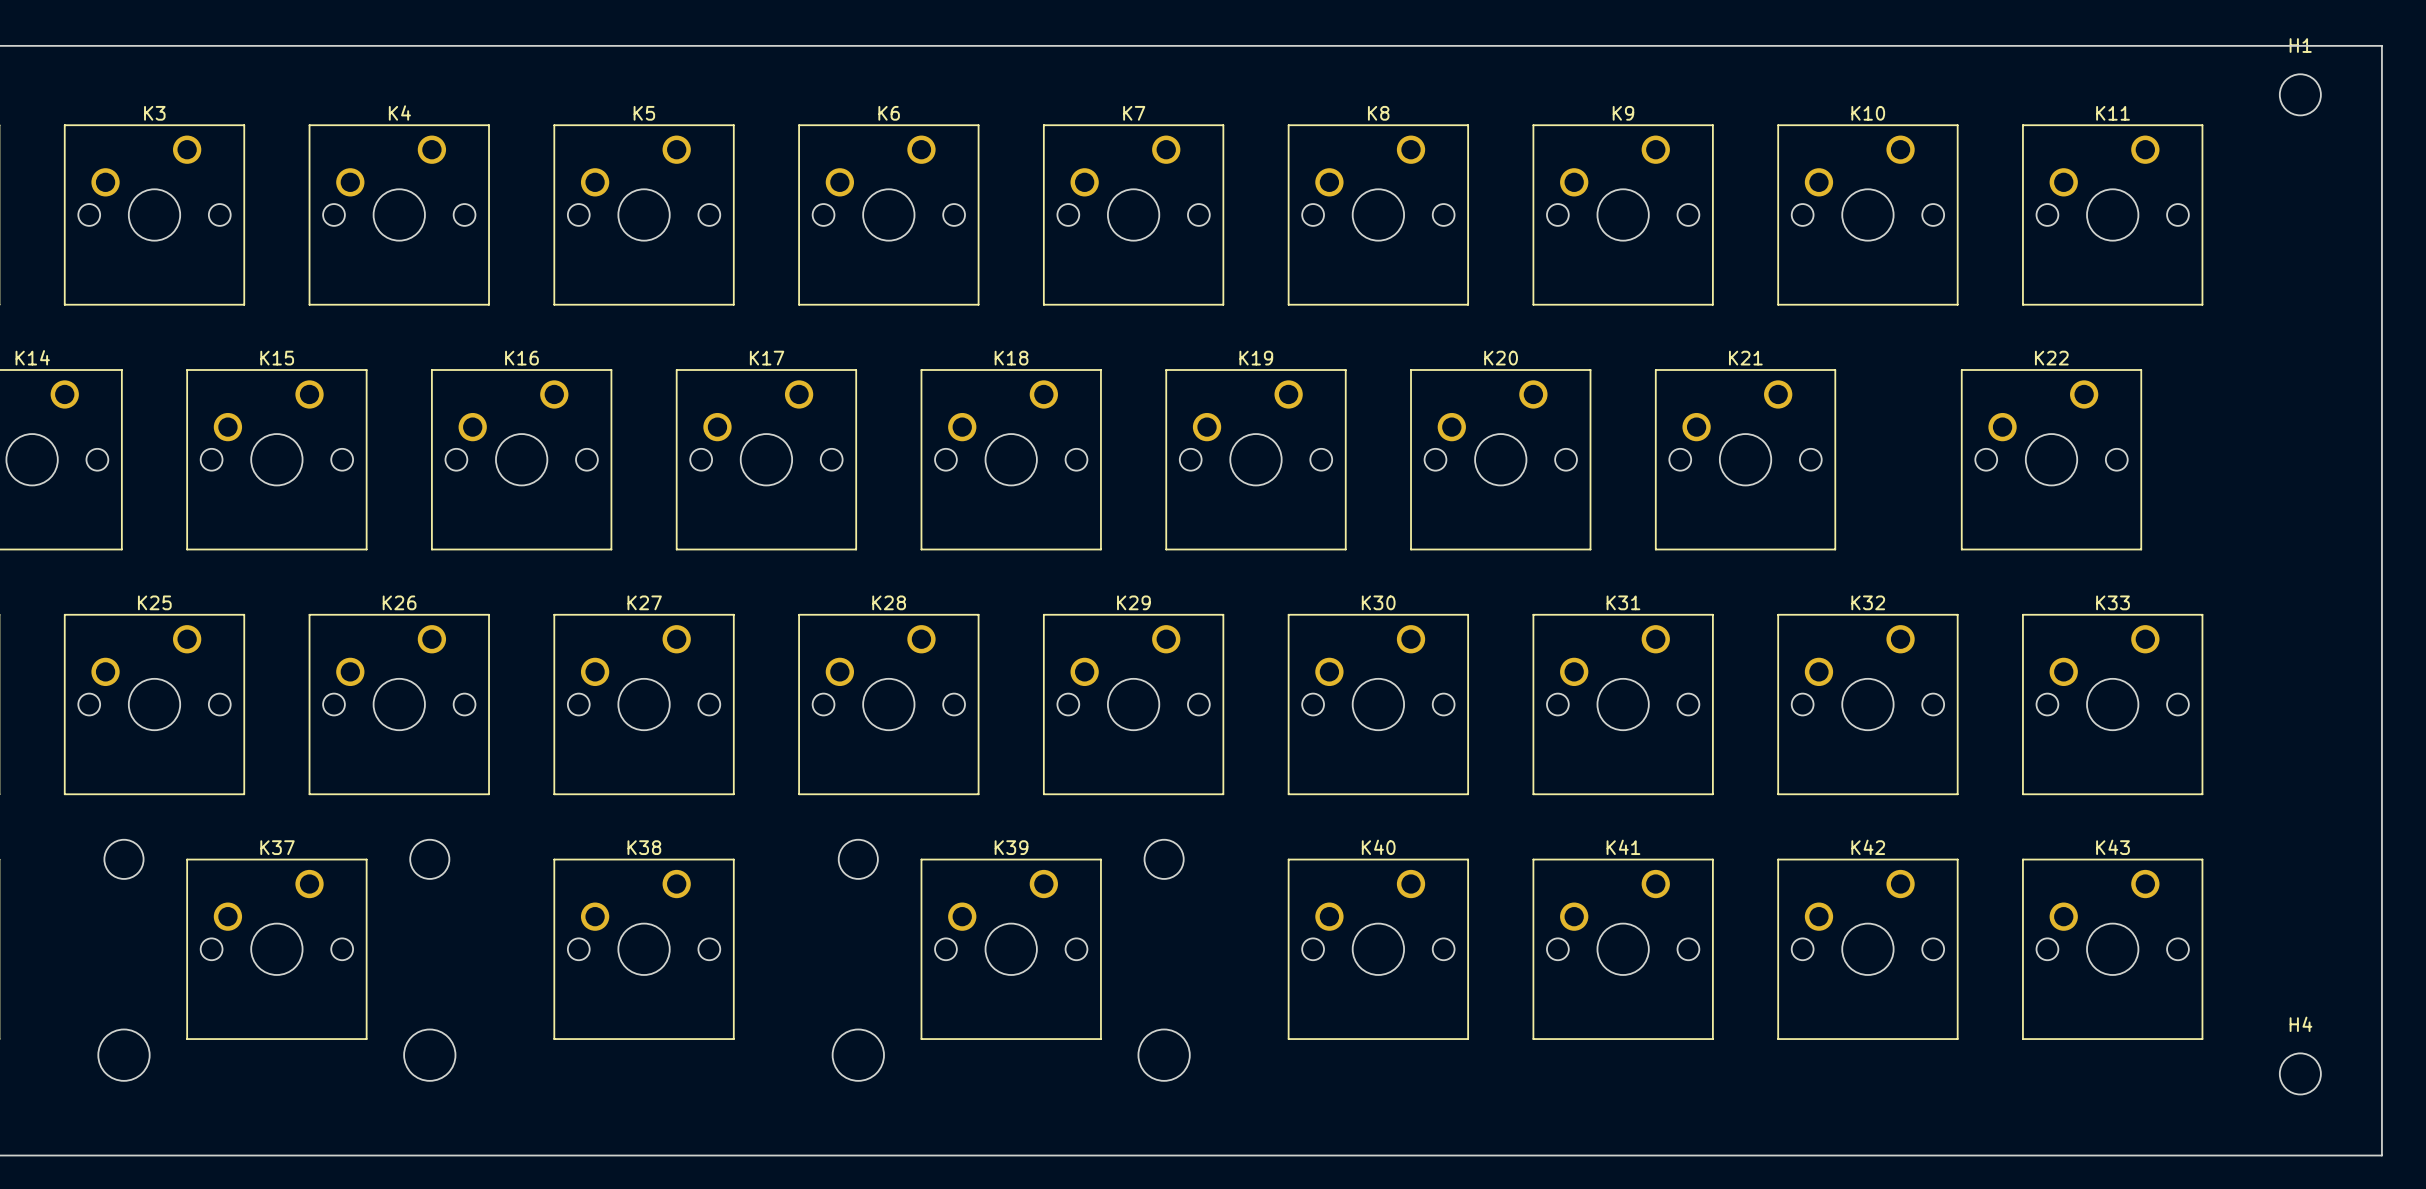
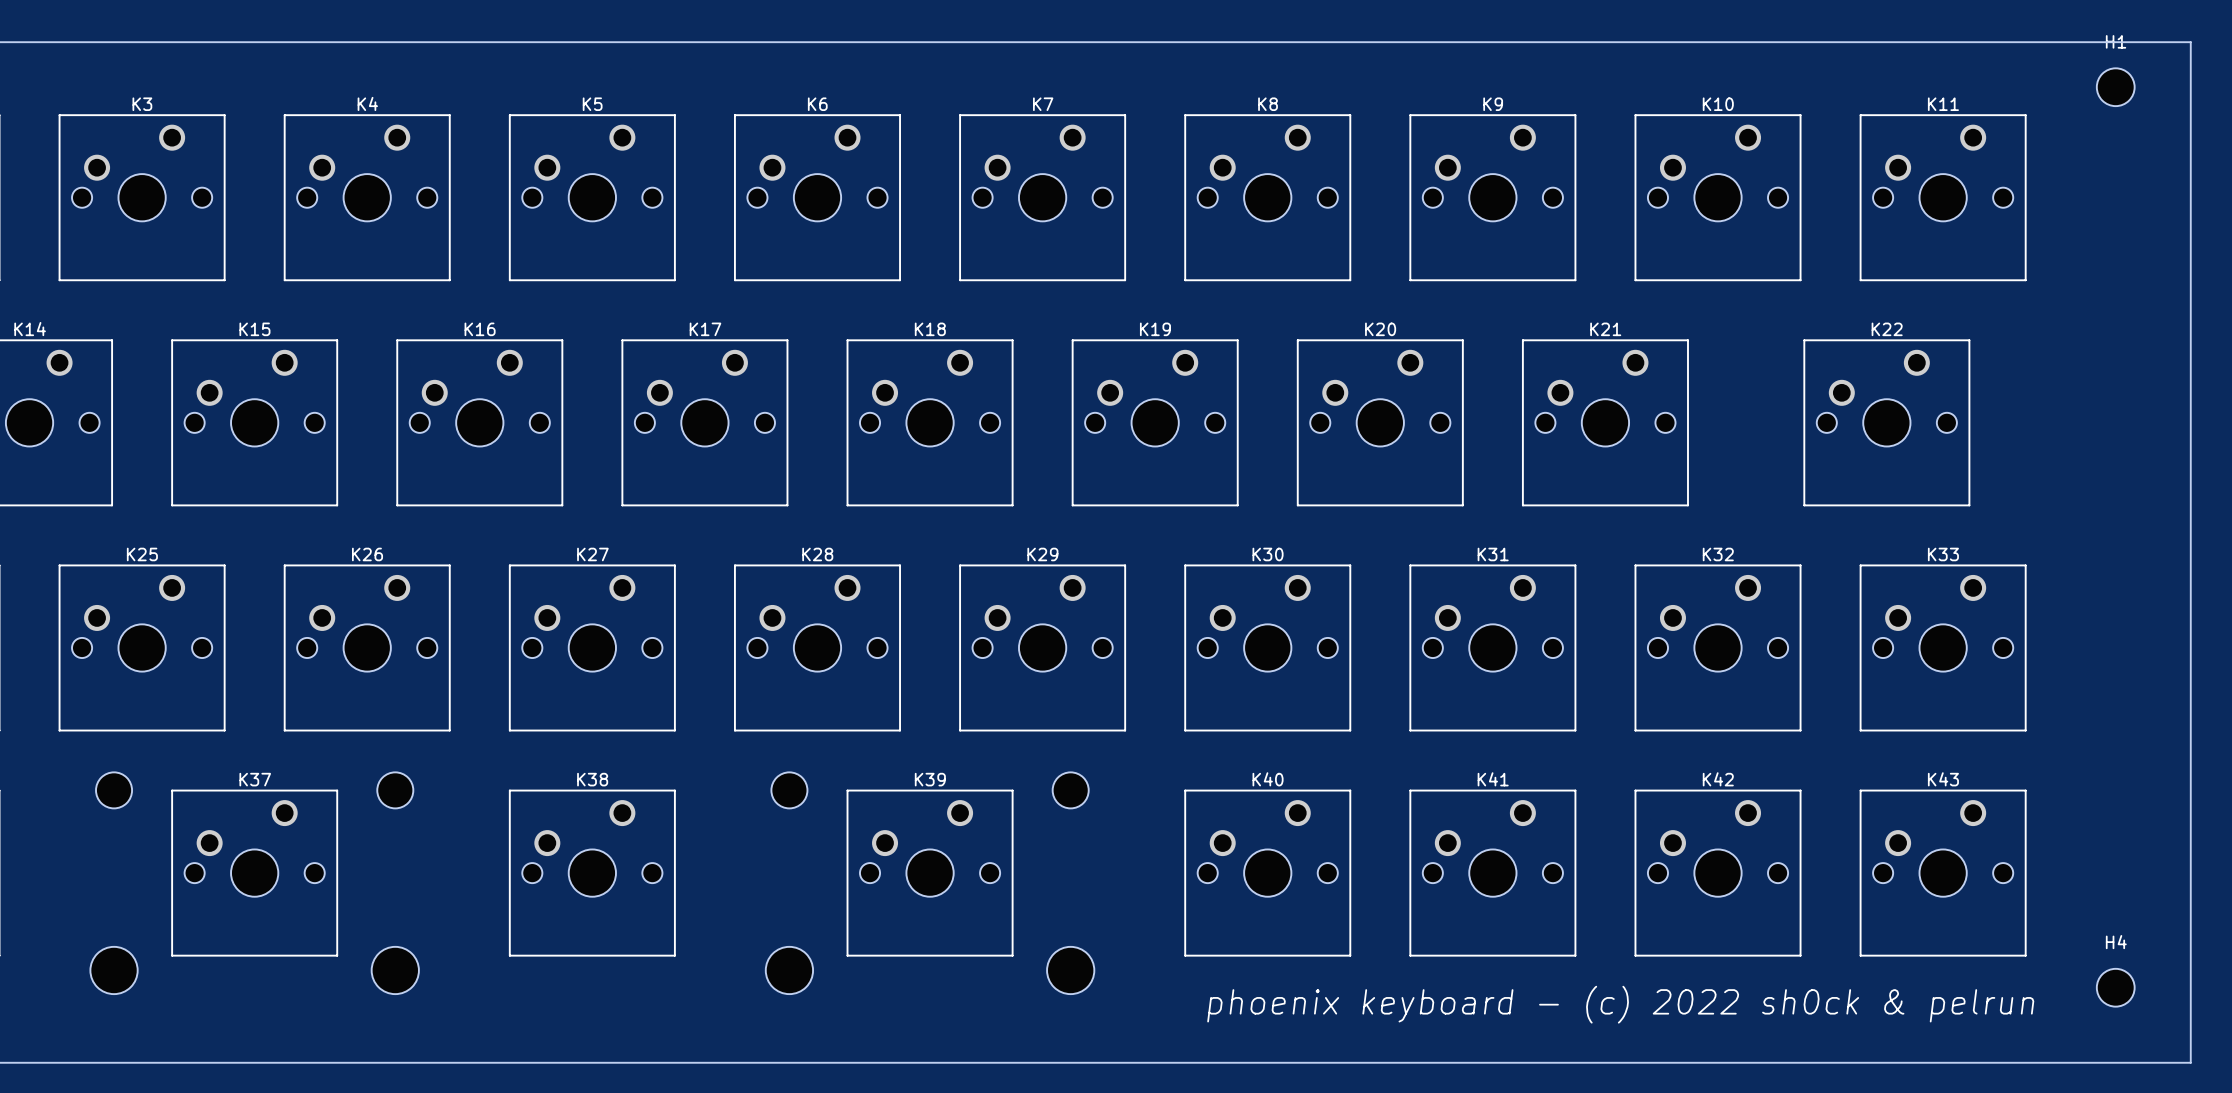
text: none -> phoenix keyboard - (c) 2022 sh0ck & pelrun (1620, 1004)

